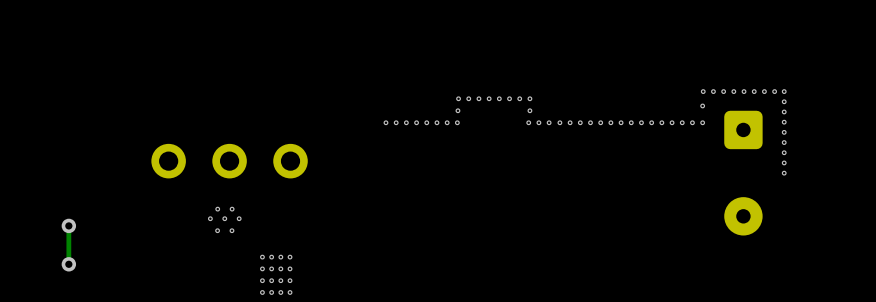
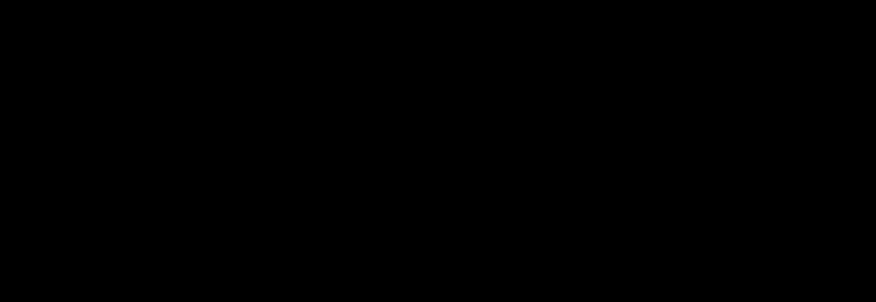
via: (703, 91) -> none
via: (713, 91) -> none
via: (723, 91) -> none
via: (733, 91) -> none
via: (744, 91) -> none
via: (754, 91) -> none
via: (764, 91) -> none
via: (774, 91) -> none
via: (784, 91) -> none
via: (458, 98) -> none
via: (468, 98) -> none
via: (478, 98) -> none
via: (489, 98) -> none
via: (499, 98) -> none
via: (509, 98) -> none
via: (519, 98) -> none
via: (529, 98) -> none
via: (784, 101) -> none
via: (702, 105) -> none
via: (457, 110) -> none
via: (529, 110) -> none
via: (784, 111) -> none
via: (385, 122) -> none
via: (396, 122) -> none
via: (406, 122) -> none
via: (416, 122) -> none
via: (426, 122) -> none
via: (436, 122) -> none
via: (447, 122) -> none
via: (457, 122) -> none
via: (528, 122) -> none
via: (538, 122) -> none
via: (549, 122) -> none
via: (559, 122) -> none
via: (570, 122) -> none
via: (580, 122) -> none
via: (590, 122) -> none
via: (600, 122) -> none
via: (610, 122) -> none
via: (621, 122) -> none
via: (631, 122) -> none
via: (641, 122) -> none
via: (651, 122) -> none
via: (661, 122) -> none
via: (672, 122) -> none
via: (682, 122) -> none
via: (692, 122) -> none
via: (702, 122) -> none
via: (784, 122) -> none
via: (784, 132) -> none
via: (784, 142) -> none
via: (784, 152) -> none
part: (229, 161) -> none
via: (784, 162) -> none
part: (743, 173) -> none
via: (784, 173) -> none
via: (217, 209) -> none
via: (232, 209) -> none
via: (210, 218) -> none
via: (224, 218) -> none
via: (239, 218) -> none
track: (68, 225) (68, 264) -> none
via: (68, 225) -> none
via: (217, 230) -> none
via: (231, 230) -> none
via: (262, 257) -> none
via: (271, 257) -> none
via: (280, 257) -> none
via: (290, 257) -> none
via: (68, 264) -> none
via: (262, 268) -> none
via: (271, 268) -> none
via: (280, 268) -> none
via: (290, 268) -> none
via: (262, 280) -> none
via: (271, 280) -> none
via: (280, 280) -> none
via: (290, 280) -> none
via: (262, 292) -> none
via: (271, 292) -> none
via: (280, 292) -> none
via: (290, 292) -> none

